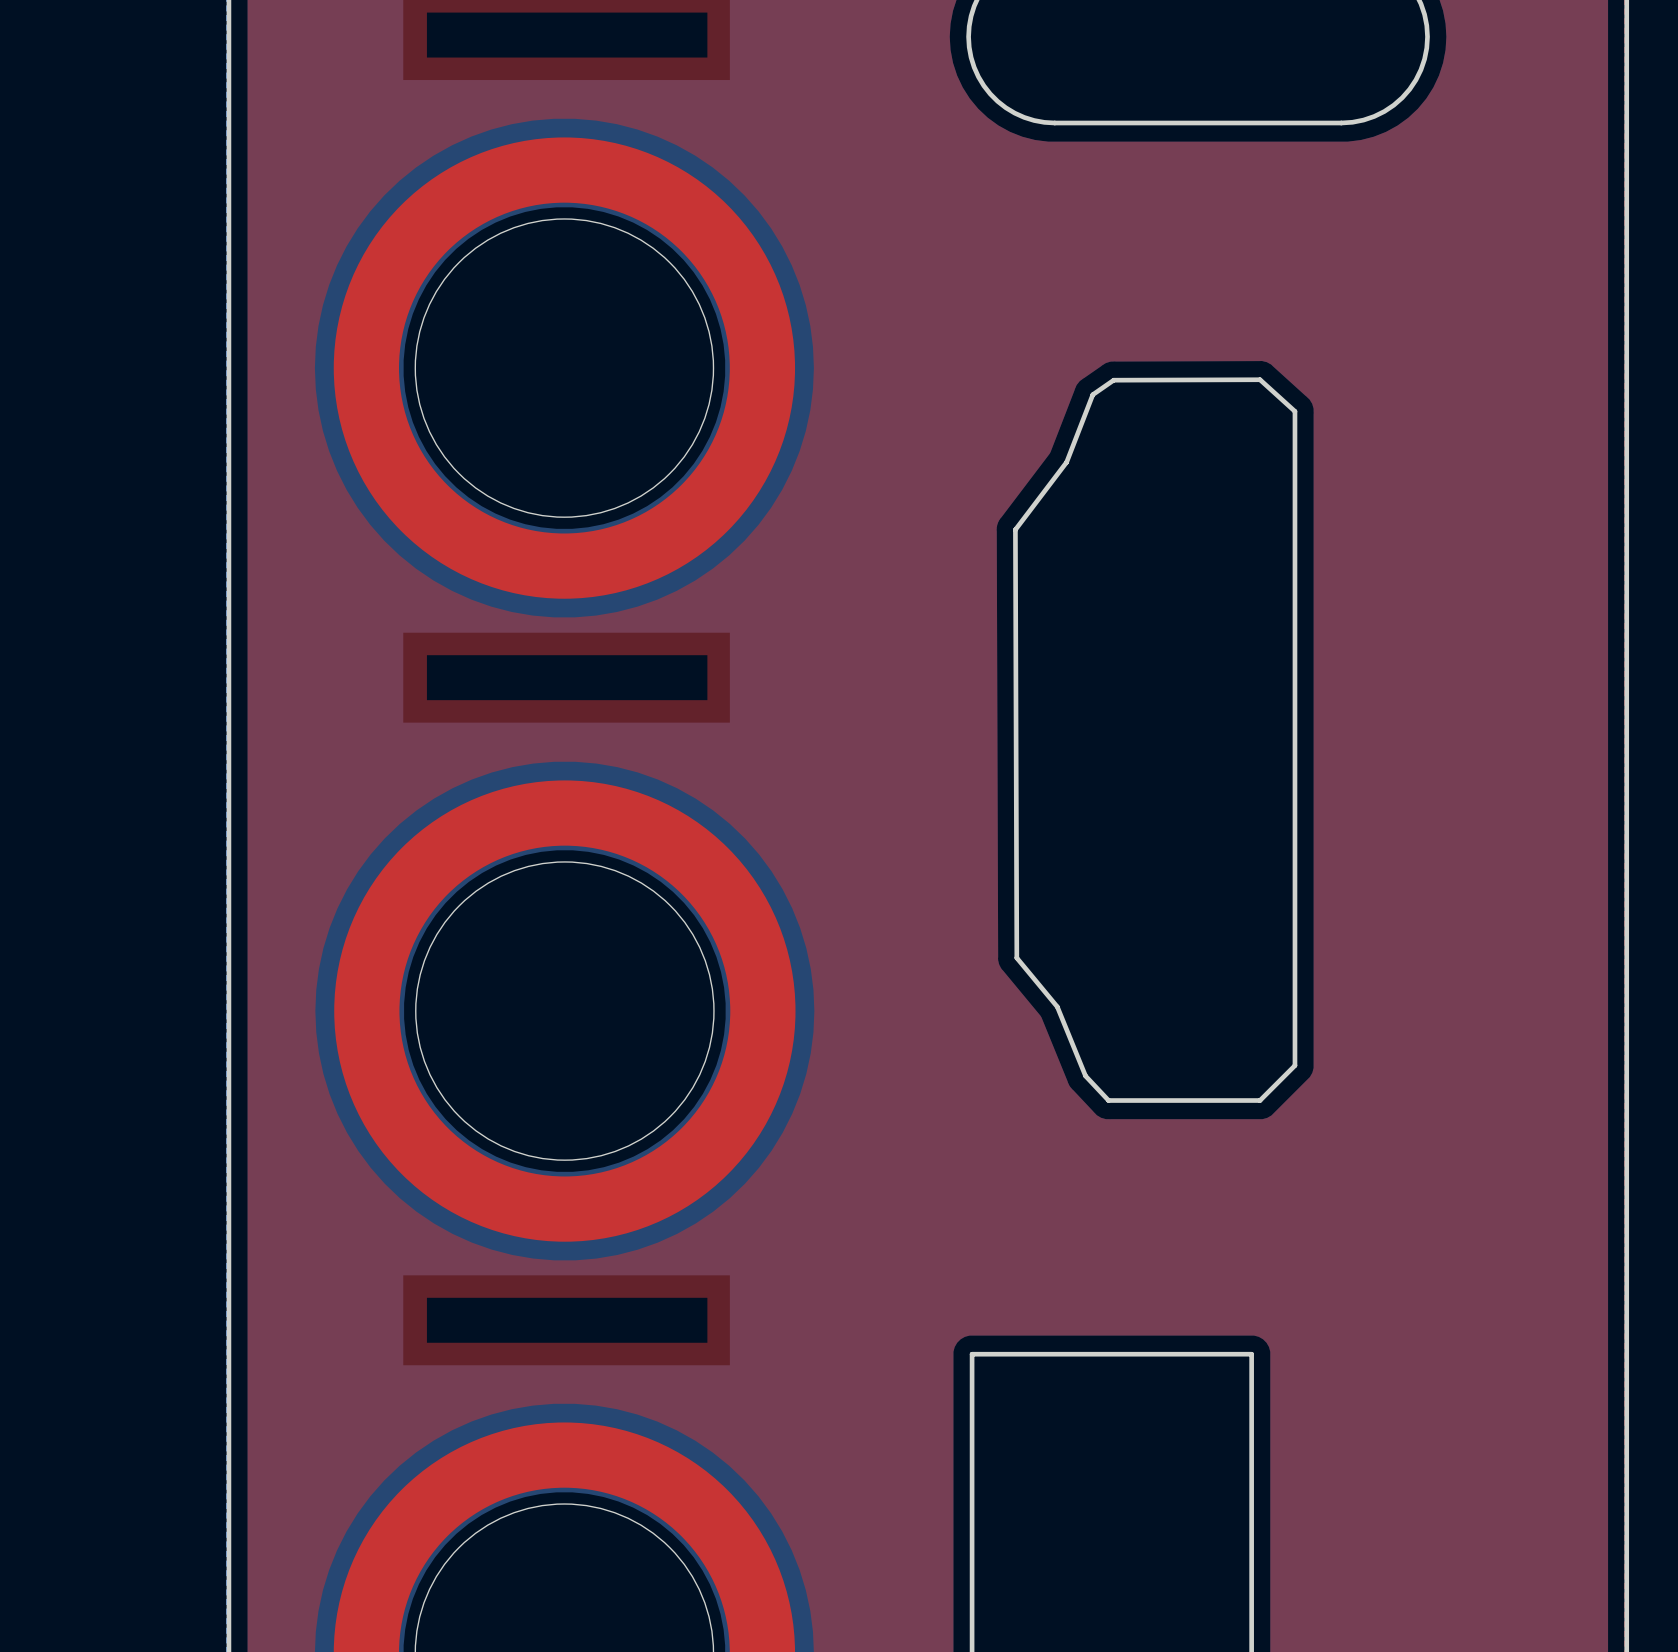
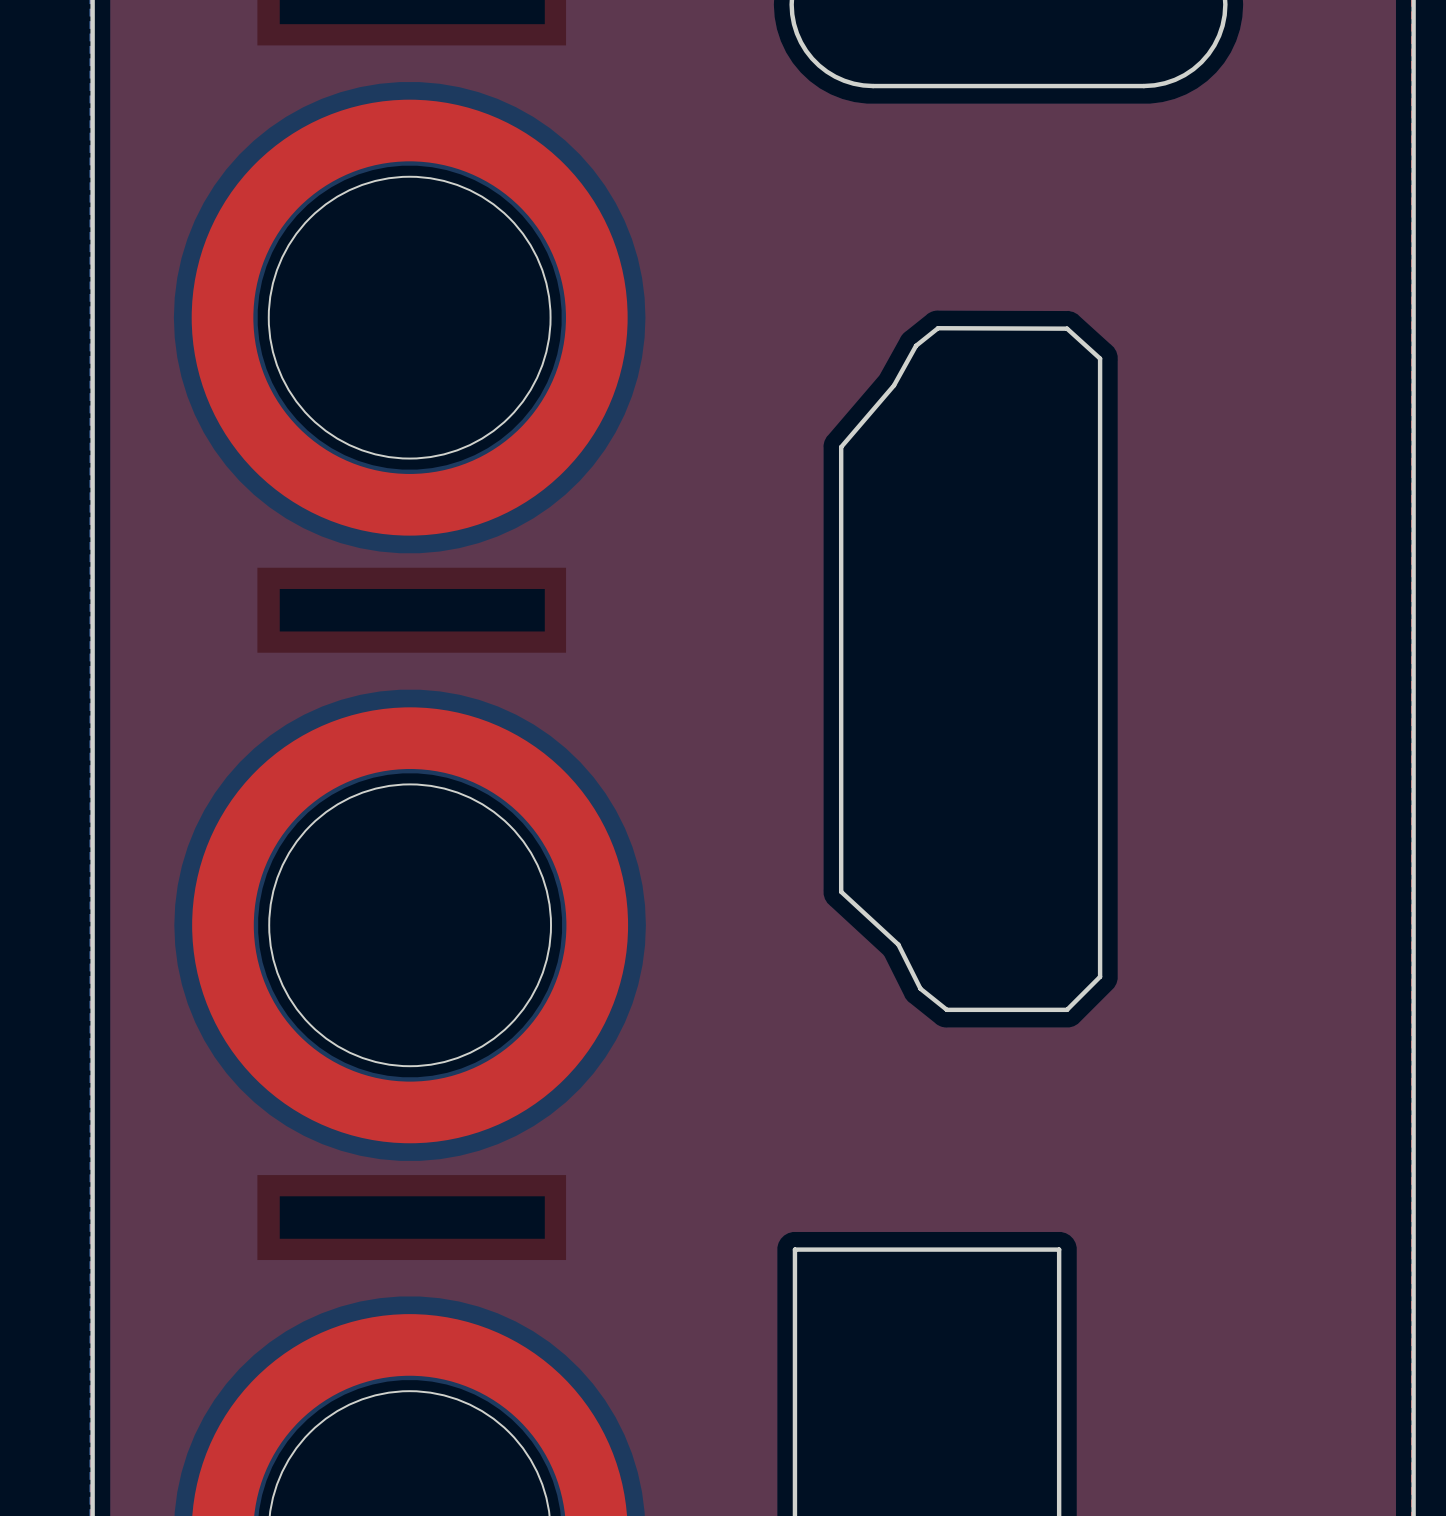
board edge: (1260, 379) (1113, 380) (1092, 394) (1066, 462) (1015, 529) (1016, 957) (1057, 1006) (1085, 1076) (1108, 1100) (1132, 1100) -> (1067, 328) (938, 328) (916, 345) (894, 385) (841, 447) (841, 891) (898, 944) (920, 988) (946, 1009)

